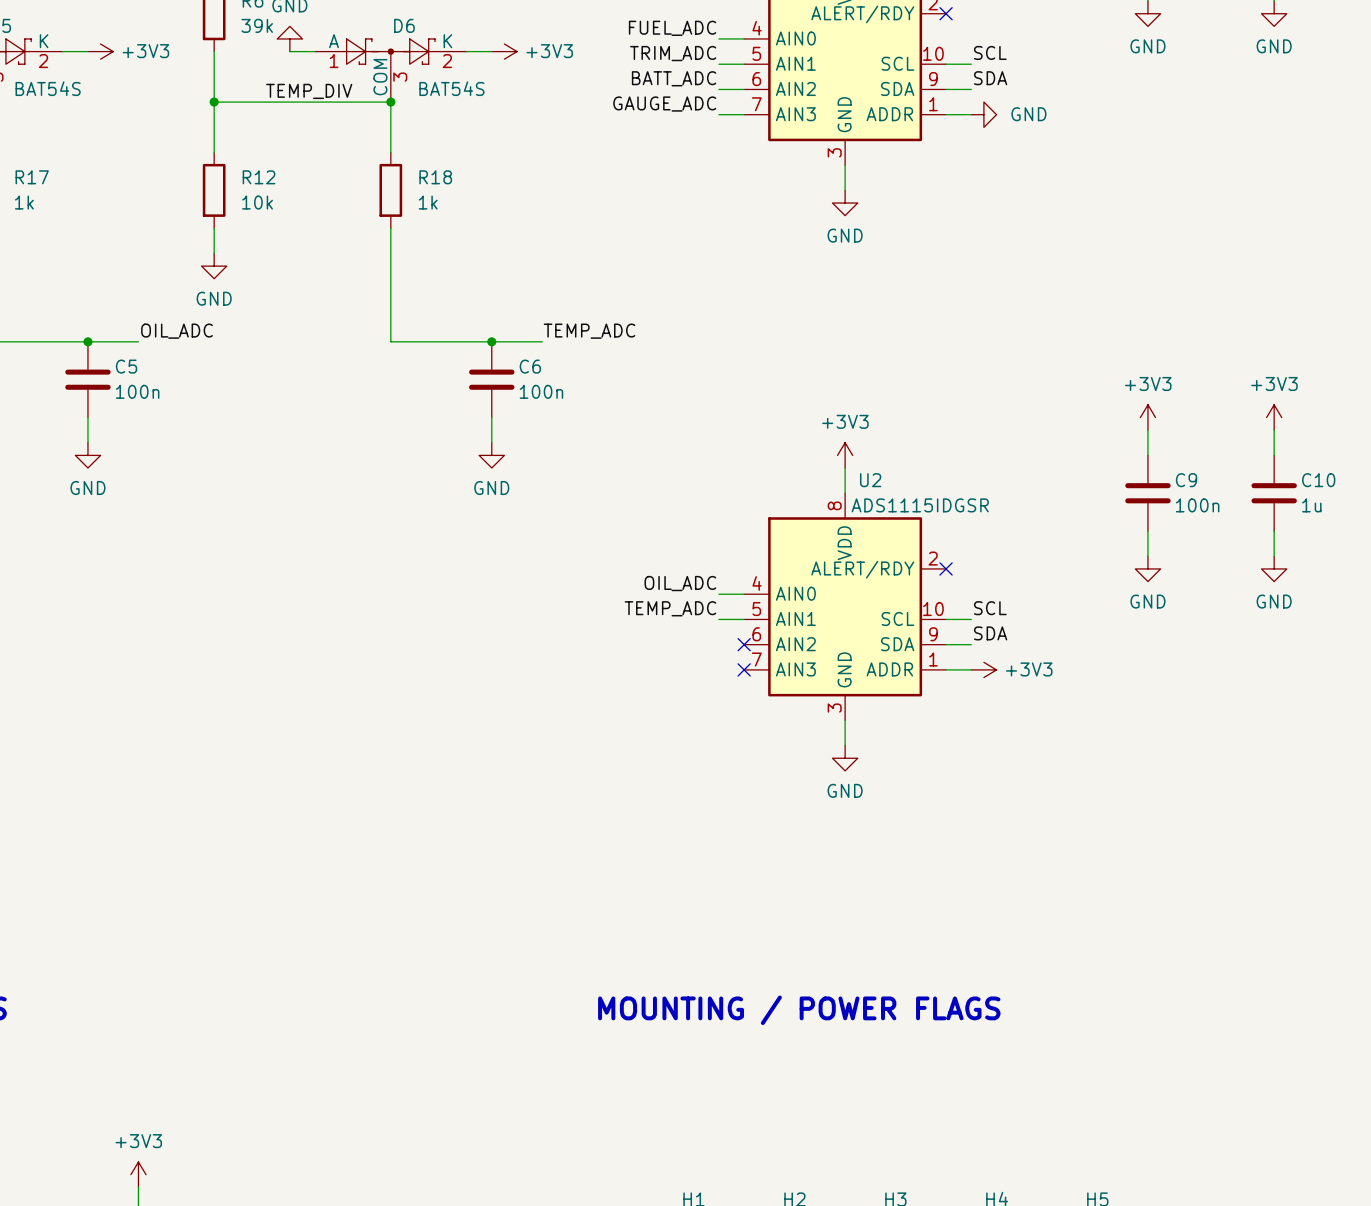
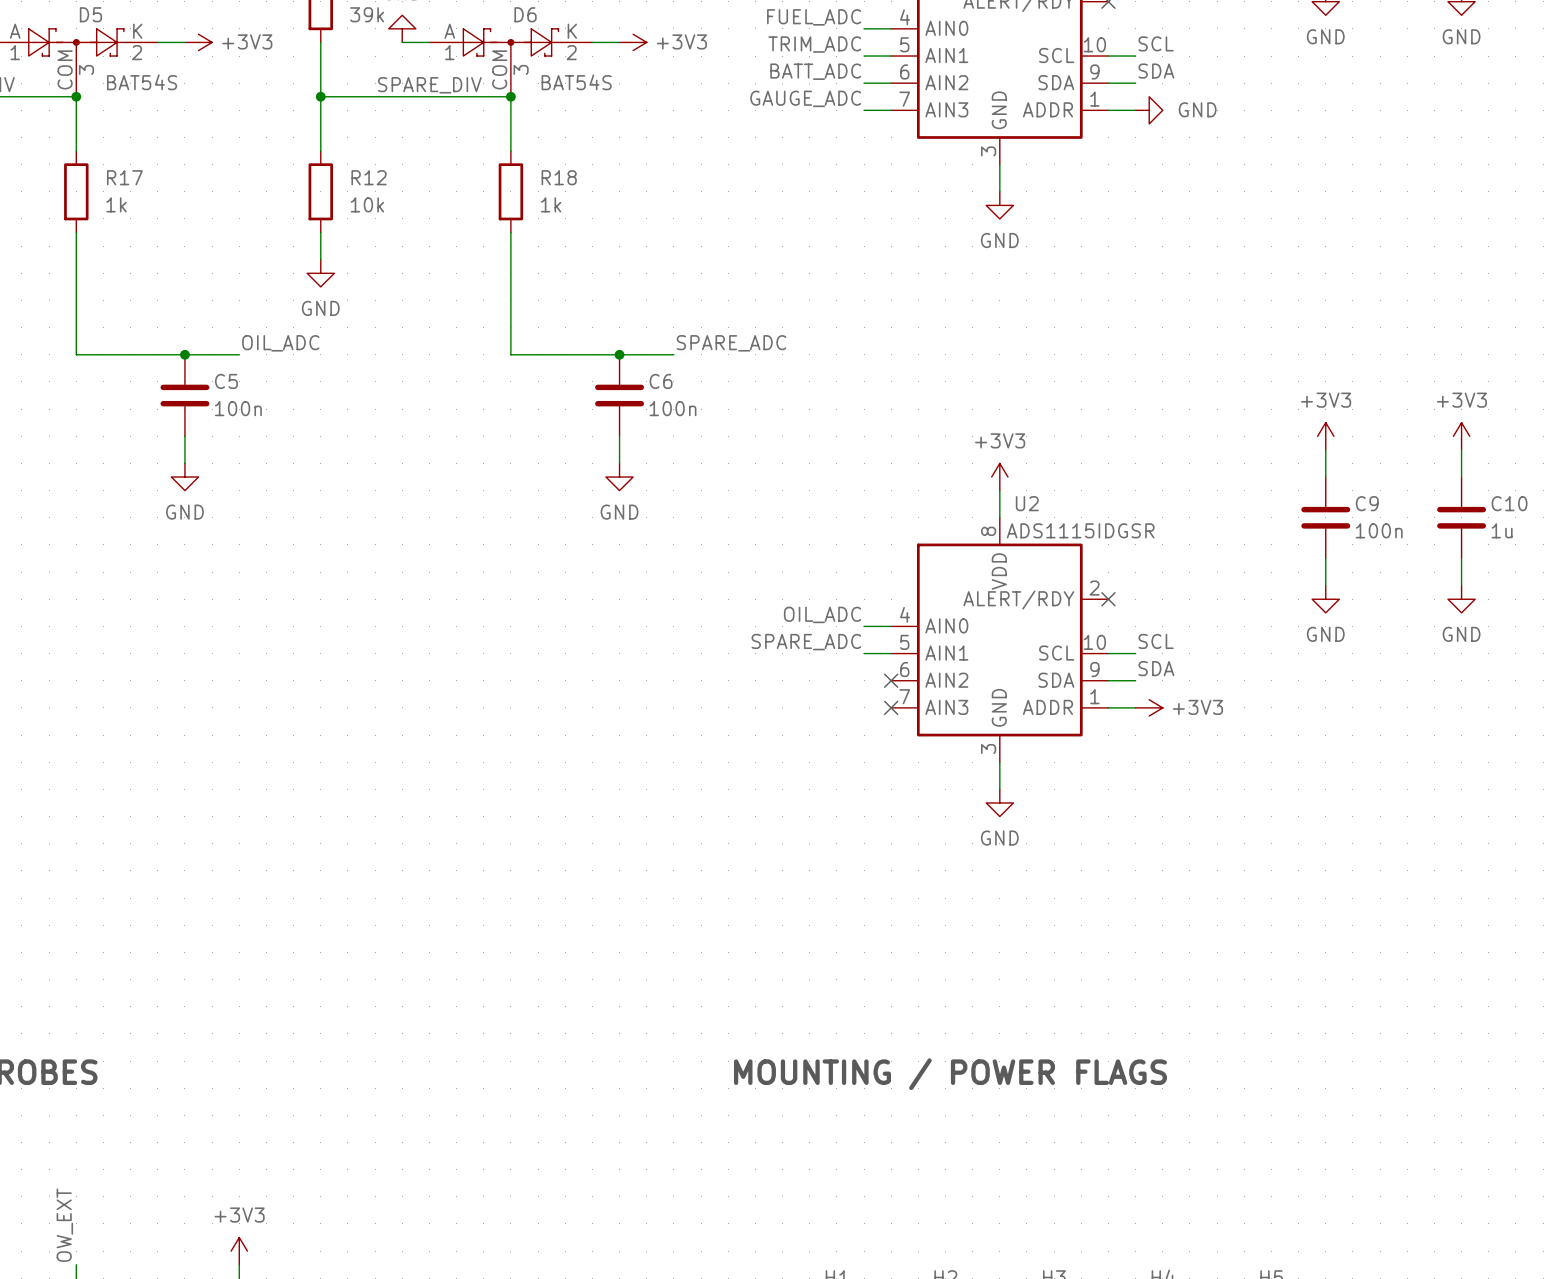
label: TEMP_DIV (309, 91) -> SPARE_DIV (429, 85)
label: TEMP_ADC (589, 331) -> SPARE_ADC (731, 343)
label: TEMP_ADC (670, 608) -> SPARE_ADC (806, 642)

